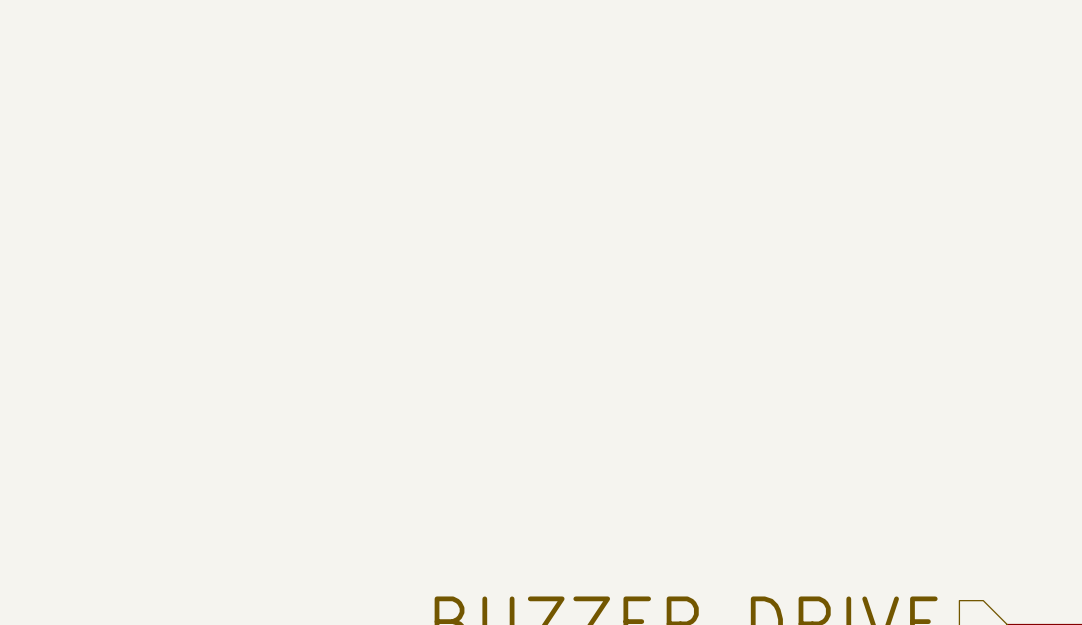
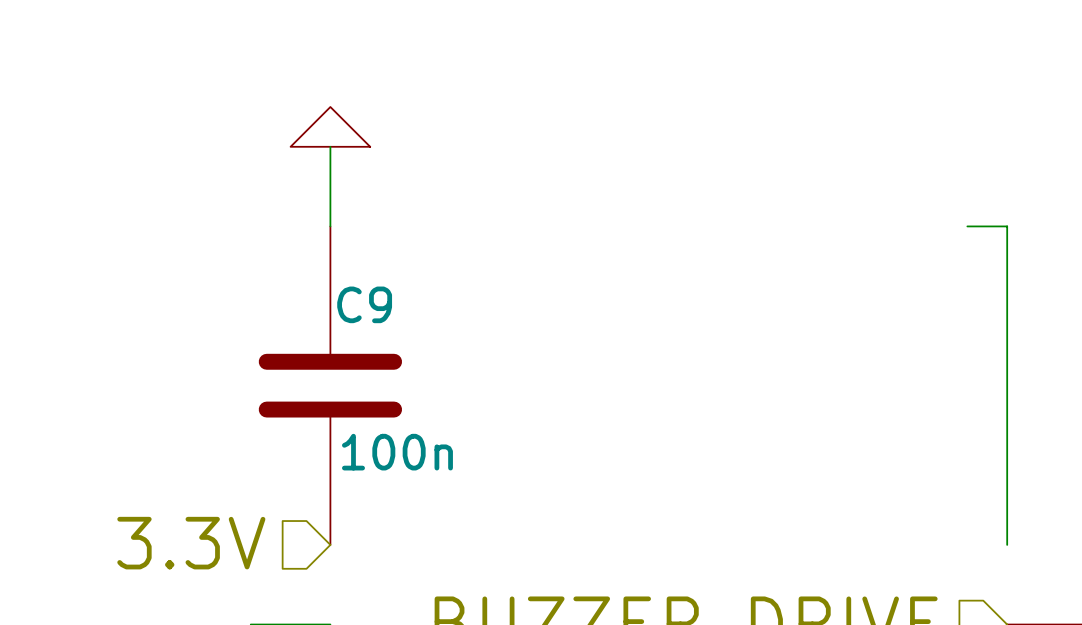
power symbol: none -> (330, 126)
wire: none -> (330, 146) (330, 226)
wire: none -> (967, 226) (1007, 226) (1007, 544)
C9: none -> 100n (330, 385)
hierarchical label: none -> 3.3V (191, 543)
wire: none -> (250, 624) (330, 624)

